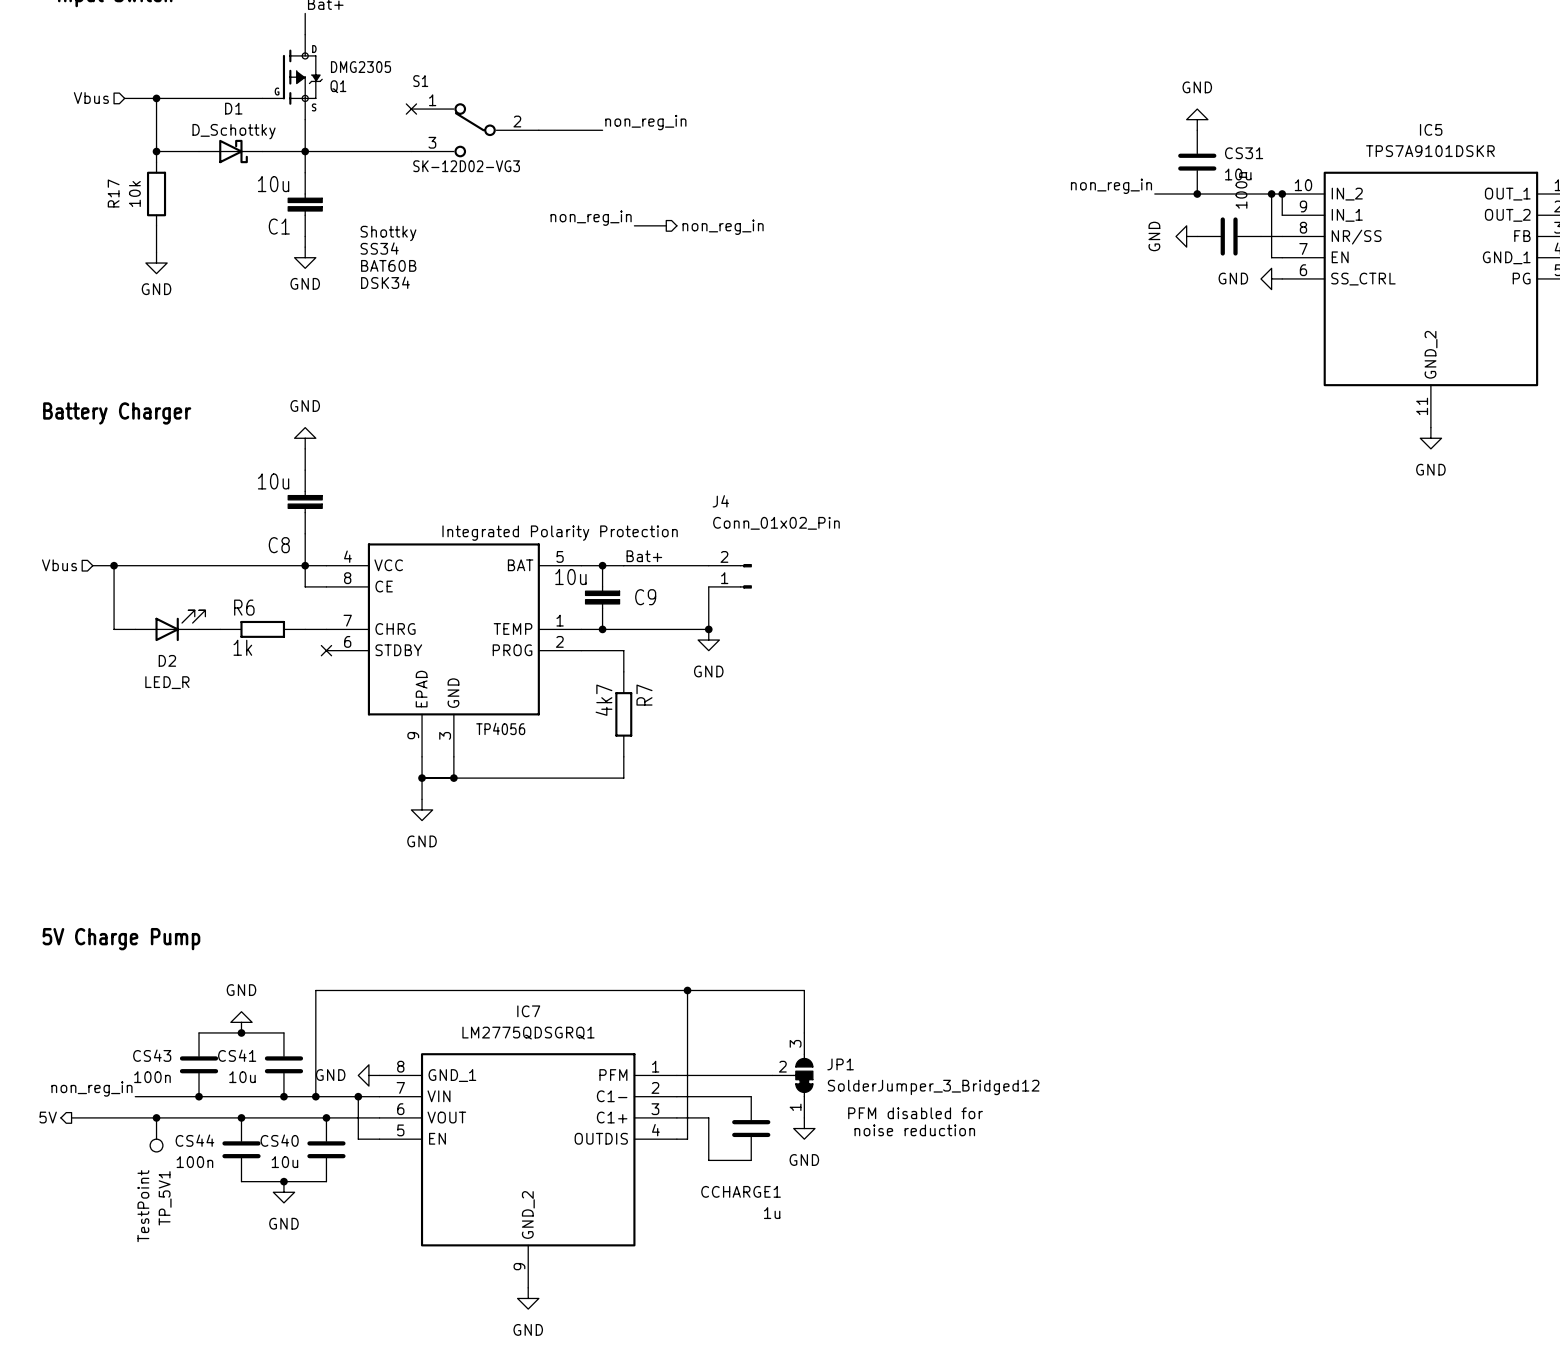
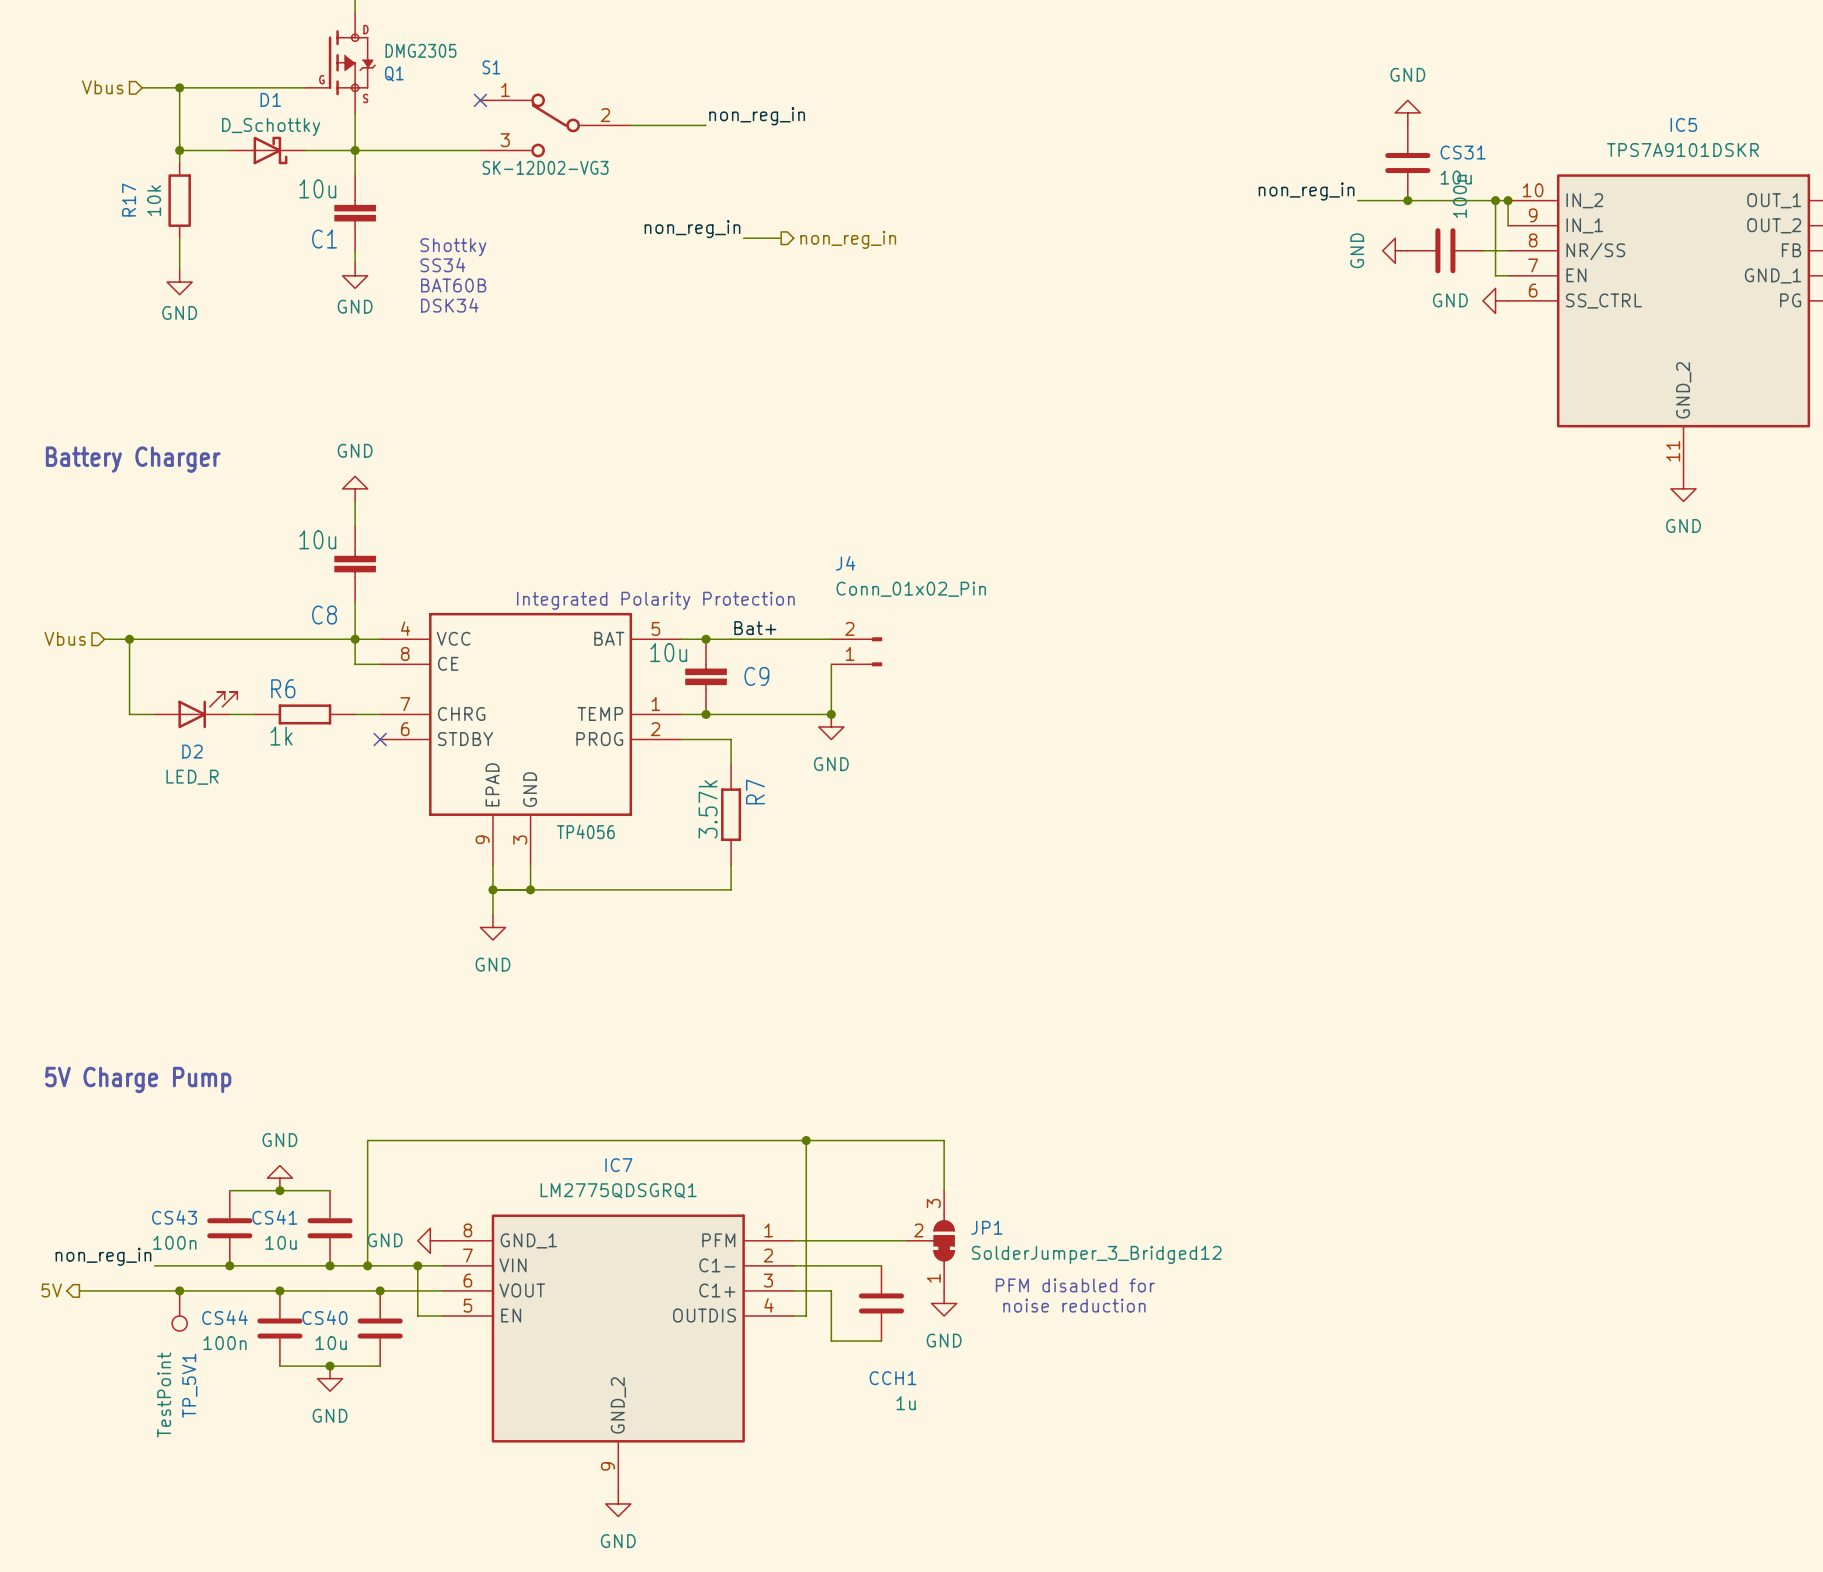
R7 value: 4k7 (603, 700) -> 3.57k (708, 809)
CCHARGE1 name: CCHARGE1 (741, 1191) -> CCH1 (893, 1378)

